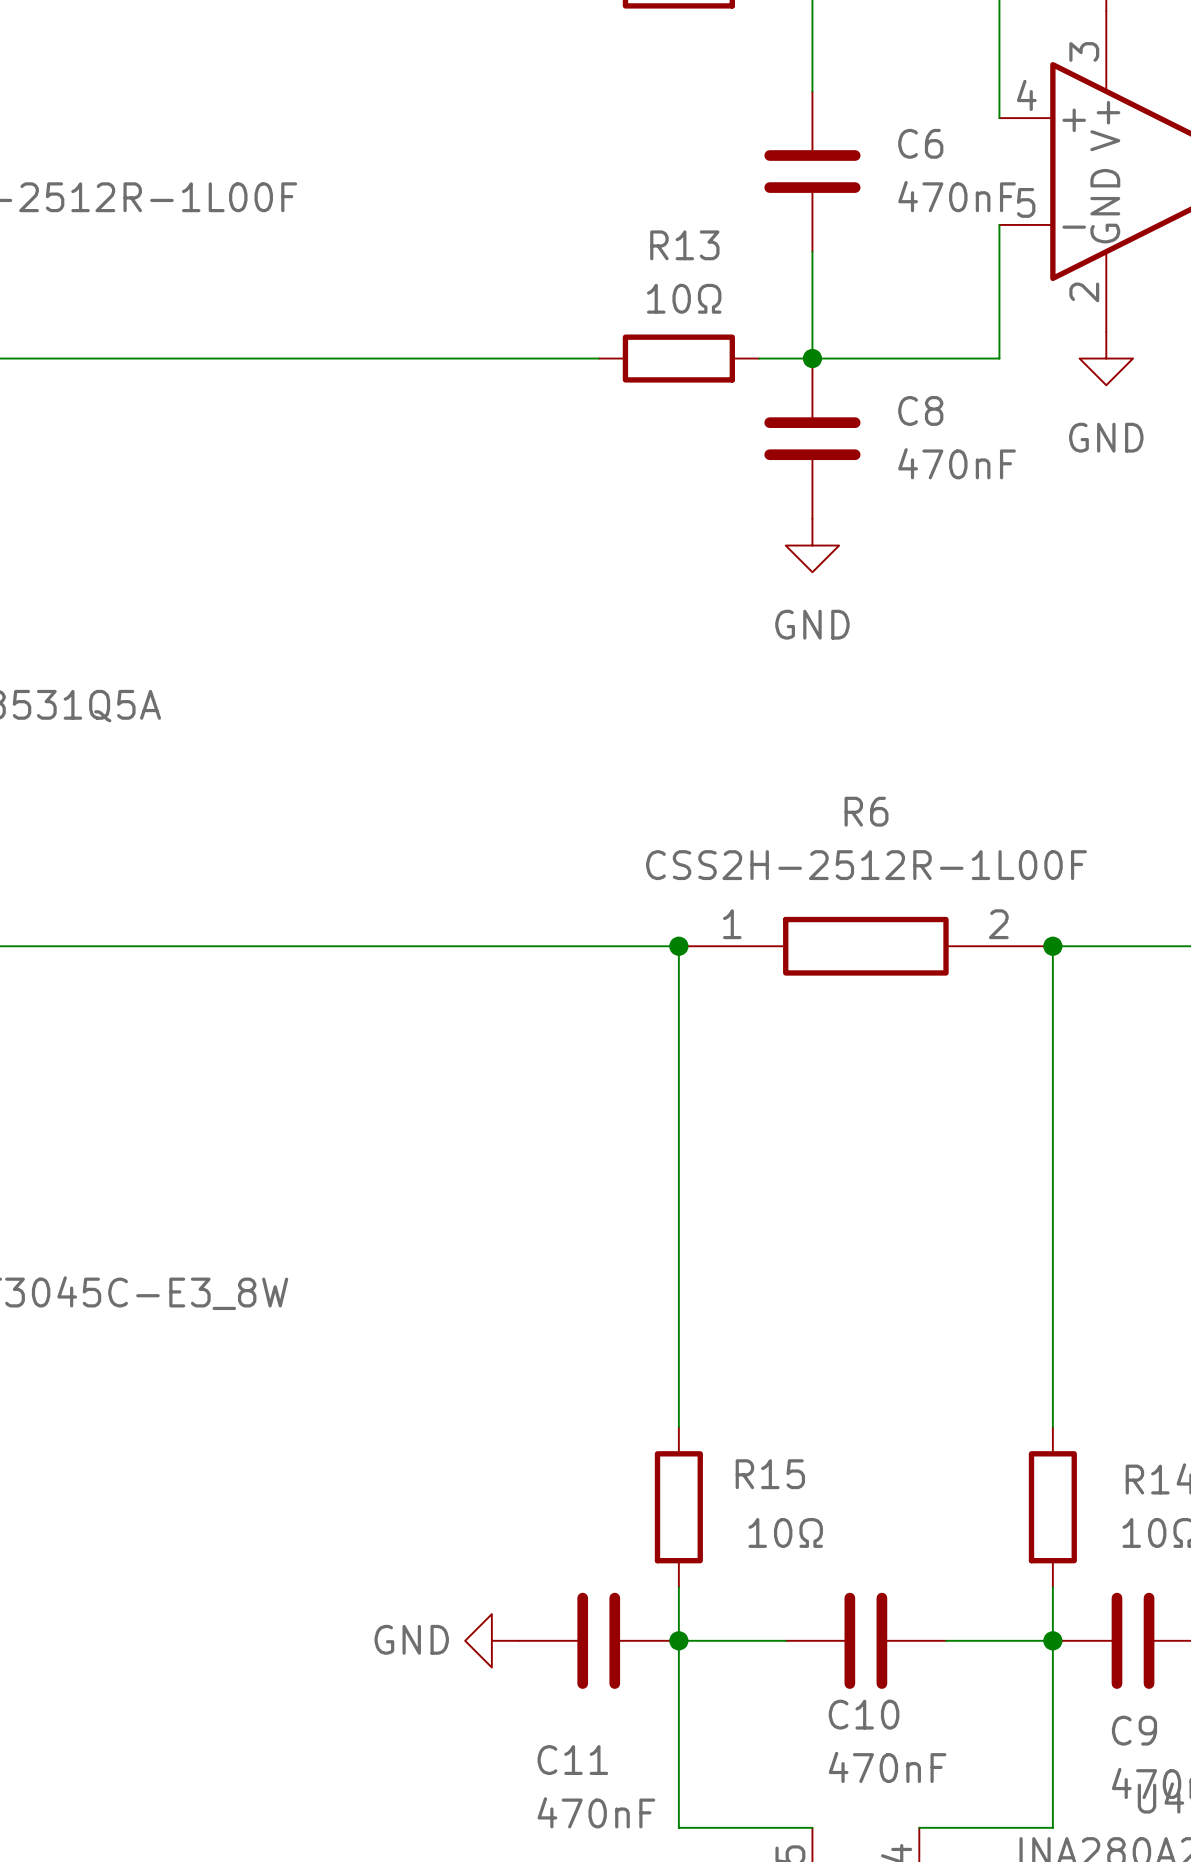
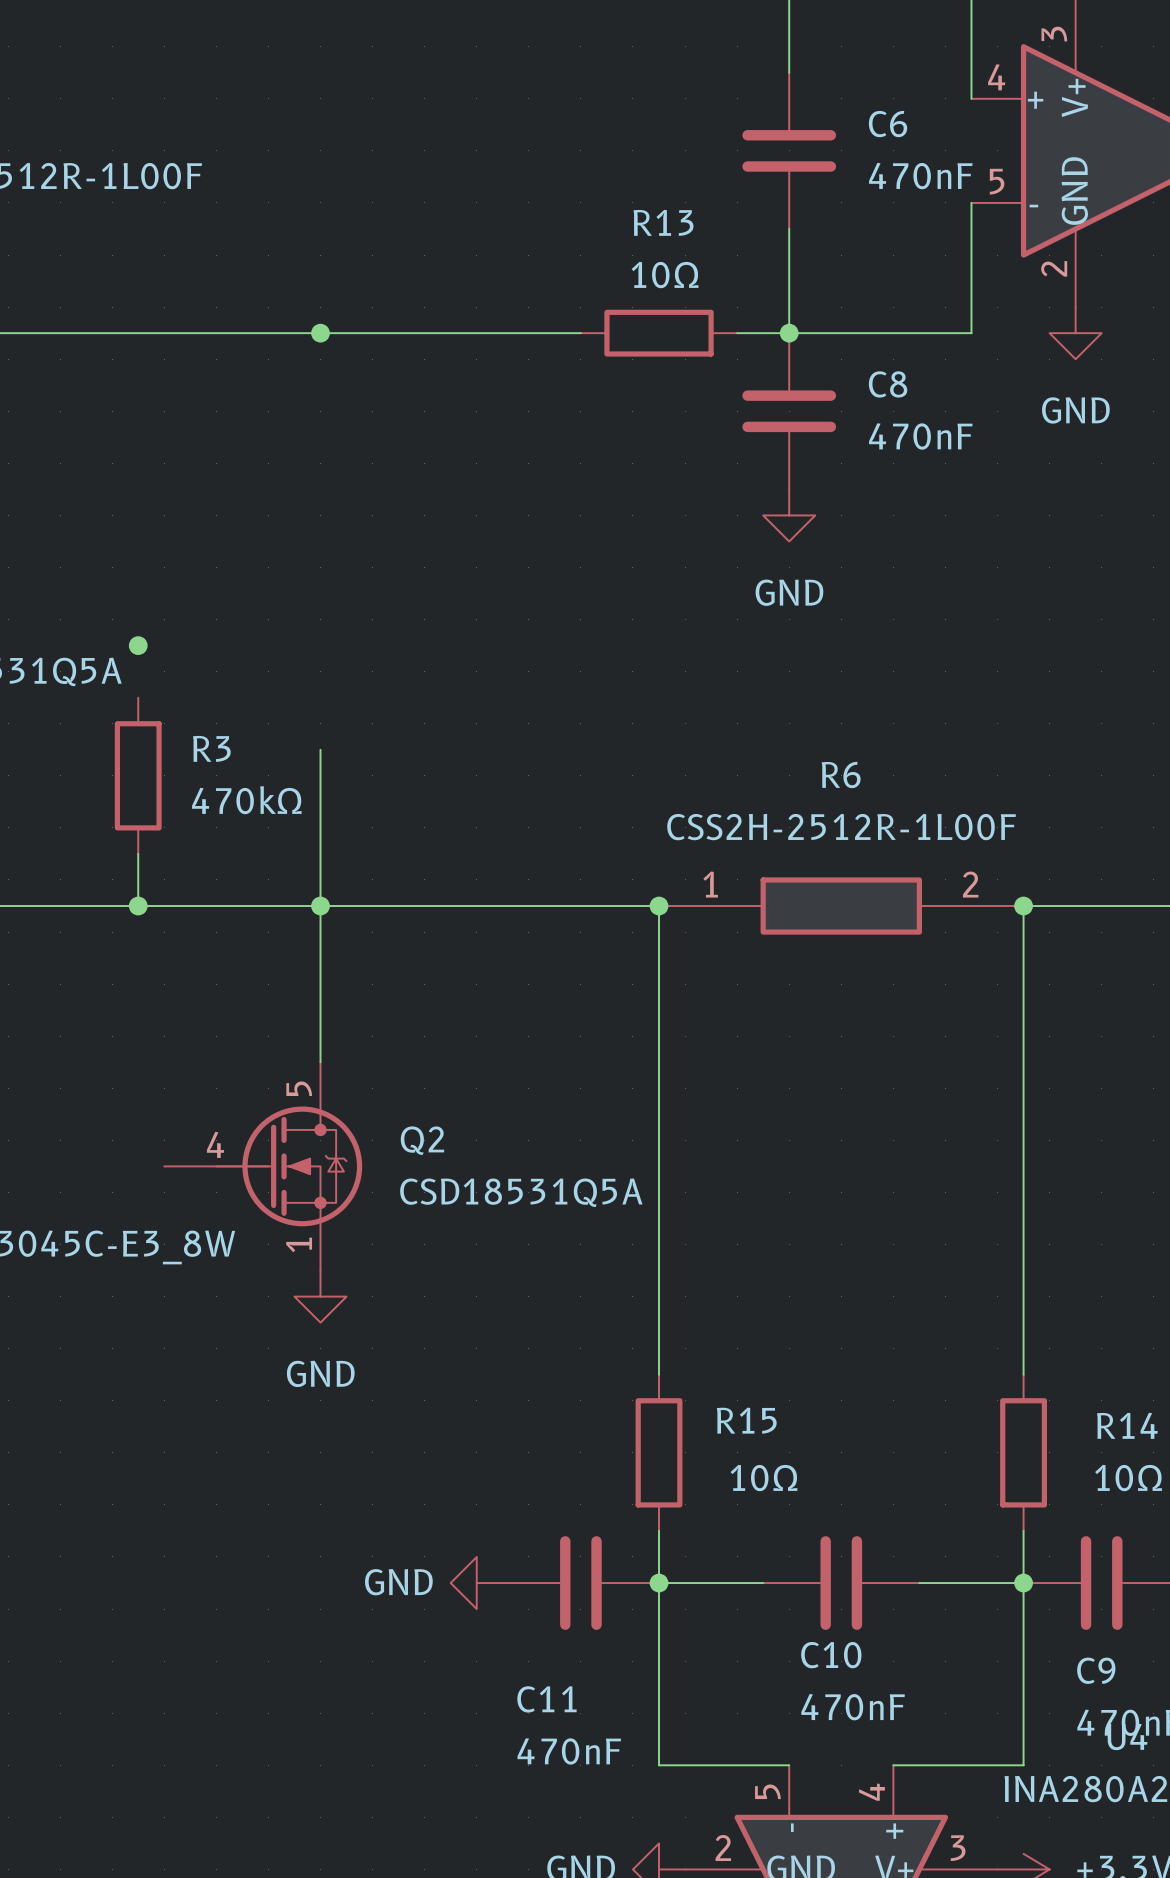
junction: none -> (320, 333)
junction: none -> (138, 645)
wire: none -> (320, 749) (320, 1062)
R3: none -> 470kΩ (138, 775)
wire: none -> (138, 853) (138, 906)
junction: none -> (138, 906)
junction: none -> (320, 906)
Q2: none -> CSD18531Q5A (263, 1166)
power symbol: none -> GND (320, 1296)

